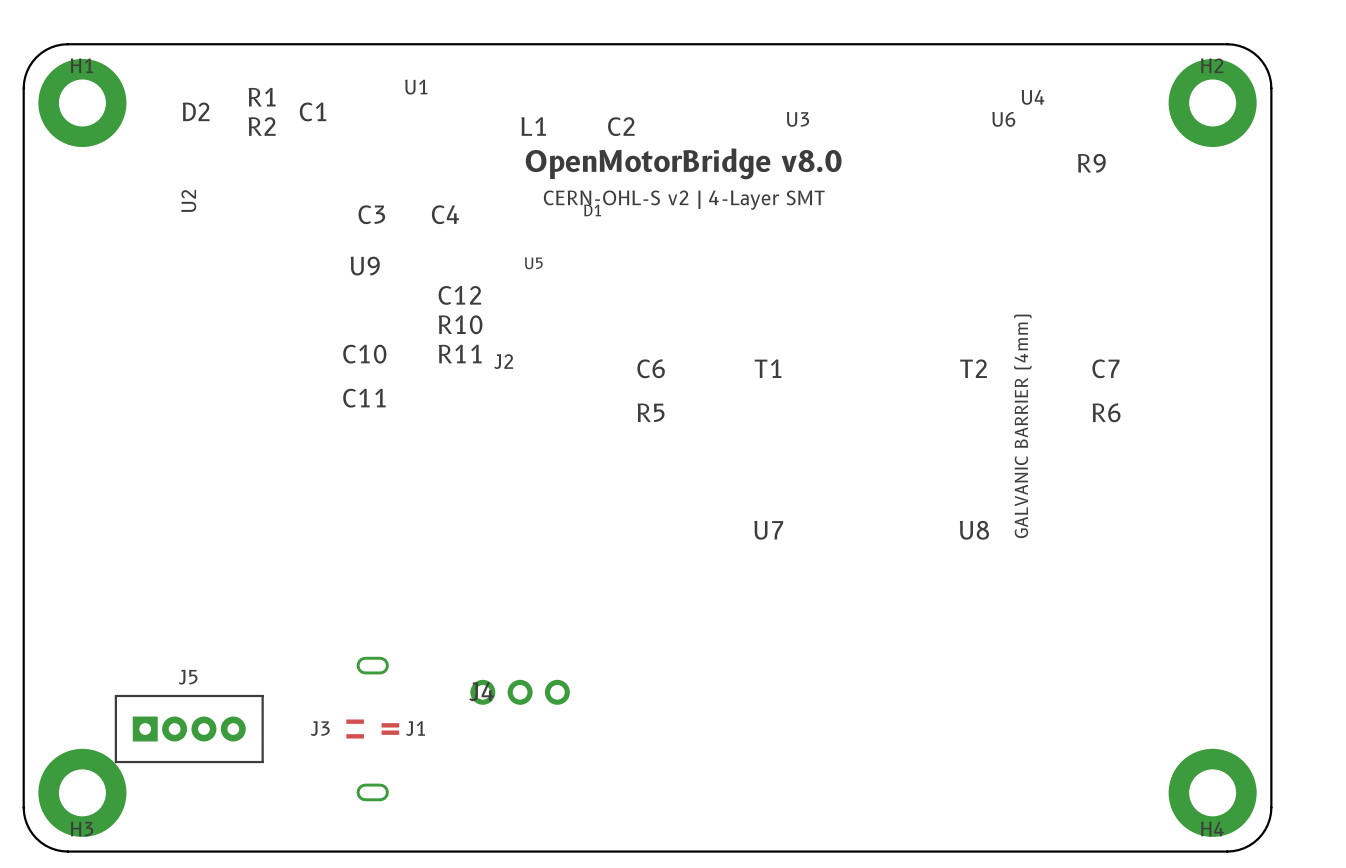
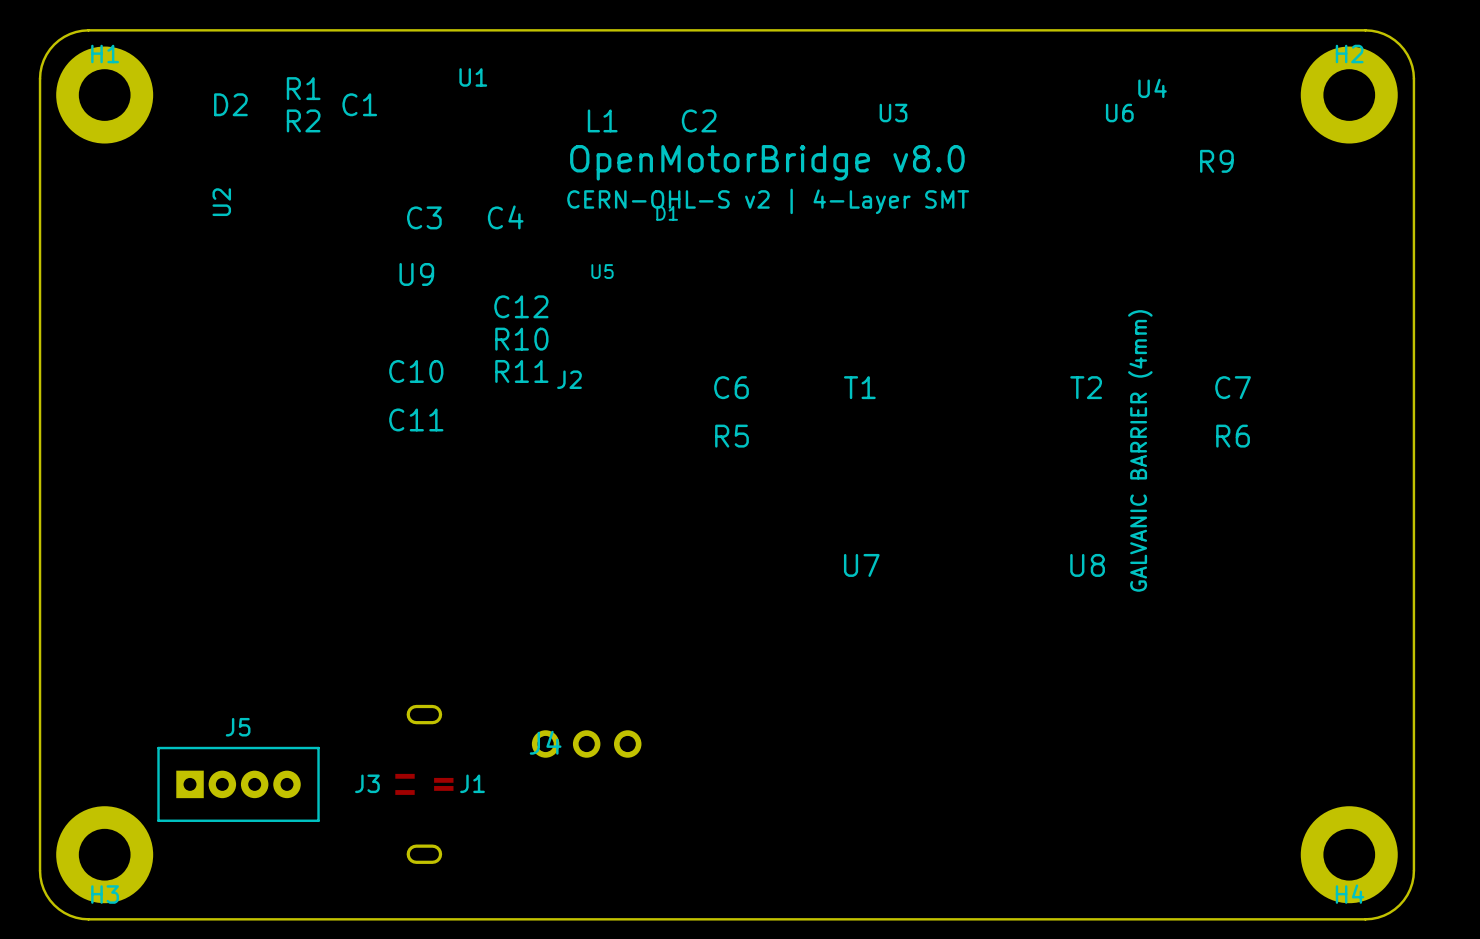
J5 footprint: [114, 694, 264, 764] -> [157, 746, 320, 822]

